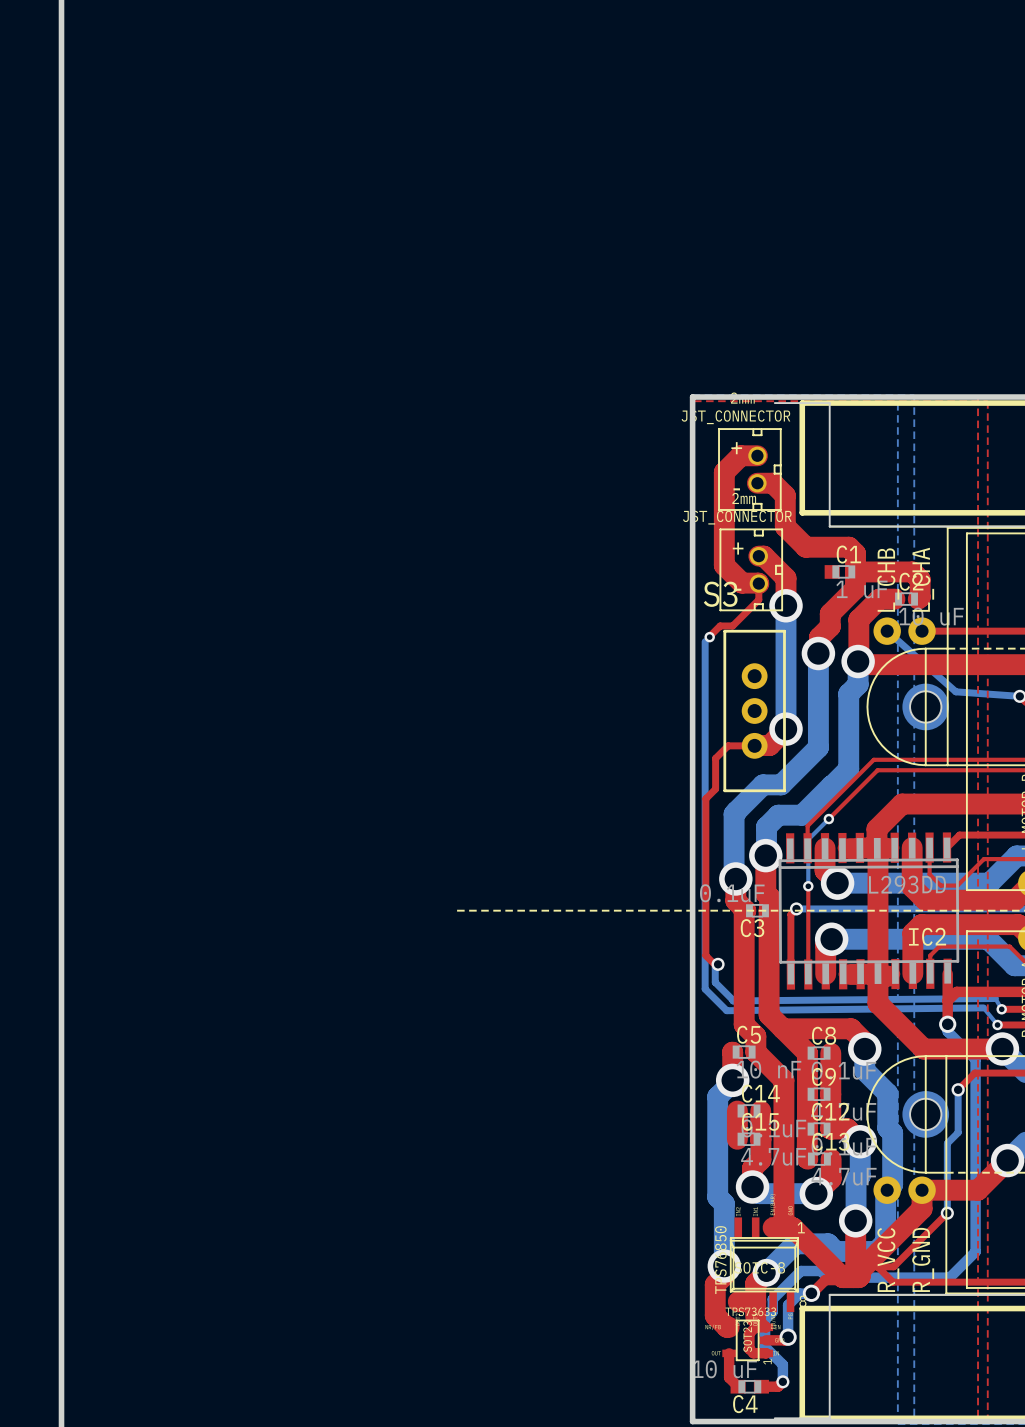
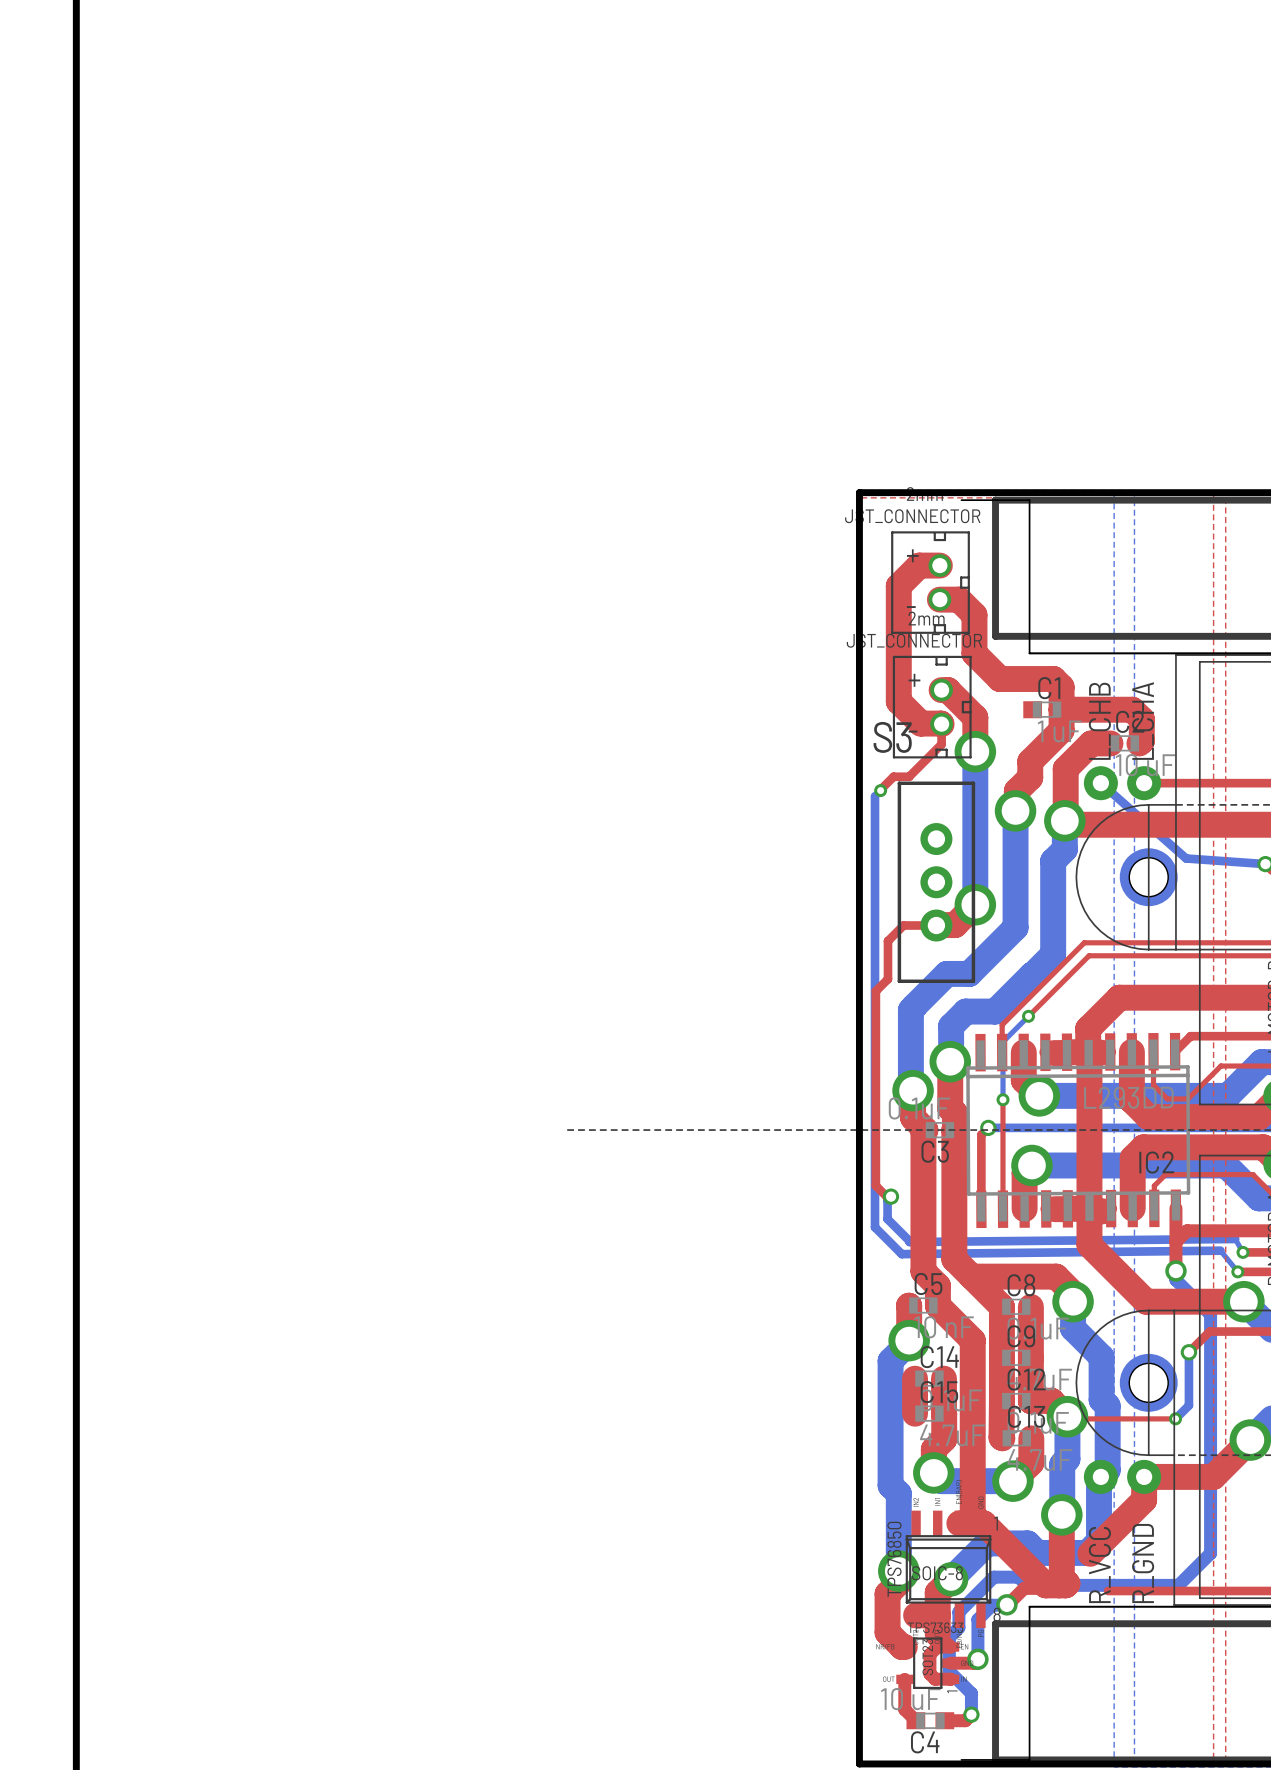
top track: none -> (1069, 1418) (1175, 1418)
bottom track: (947, 1143) (947, 1213) -> none
via: none -> (1175, 1418)
top track: (947, 1213) (893, 1266) (869, 1266) (860, 1276) (860, 1270) (878, 1252) (878, 1267) (892, 1282) -> none
via: (947, 1213) -> none

